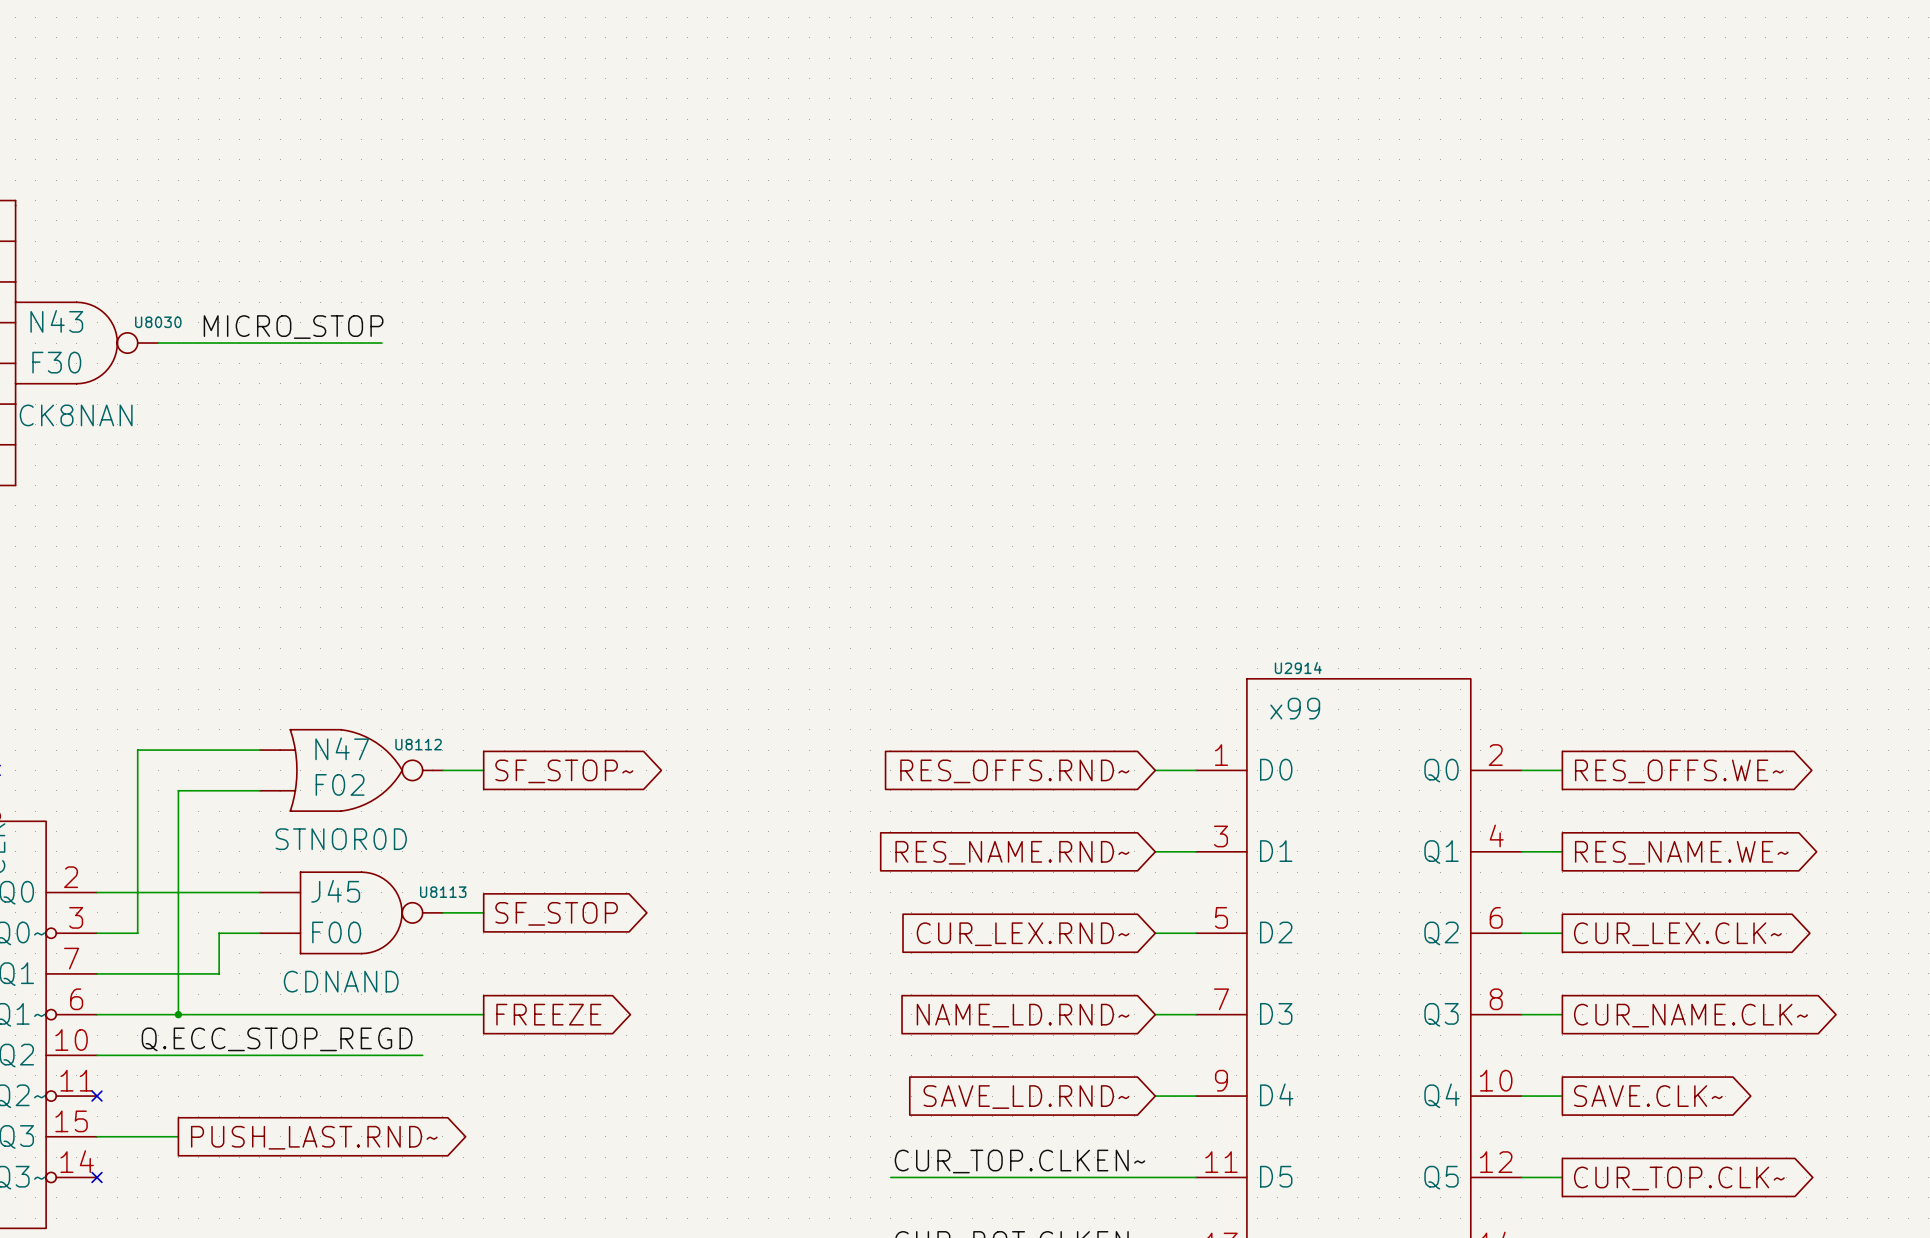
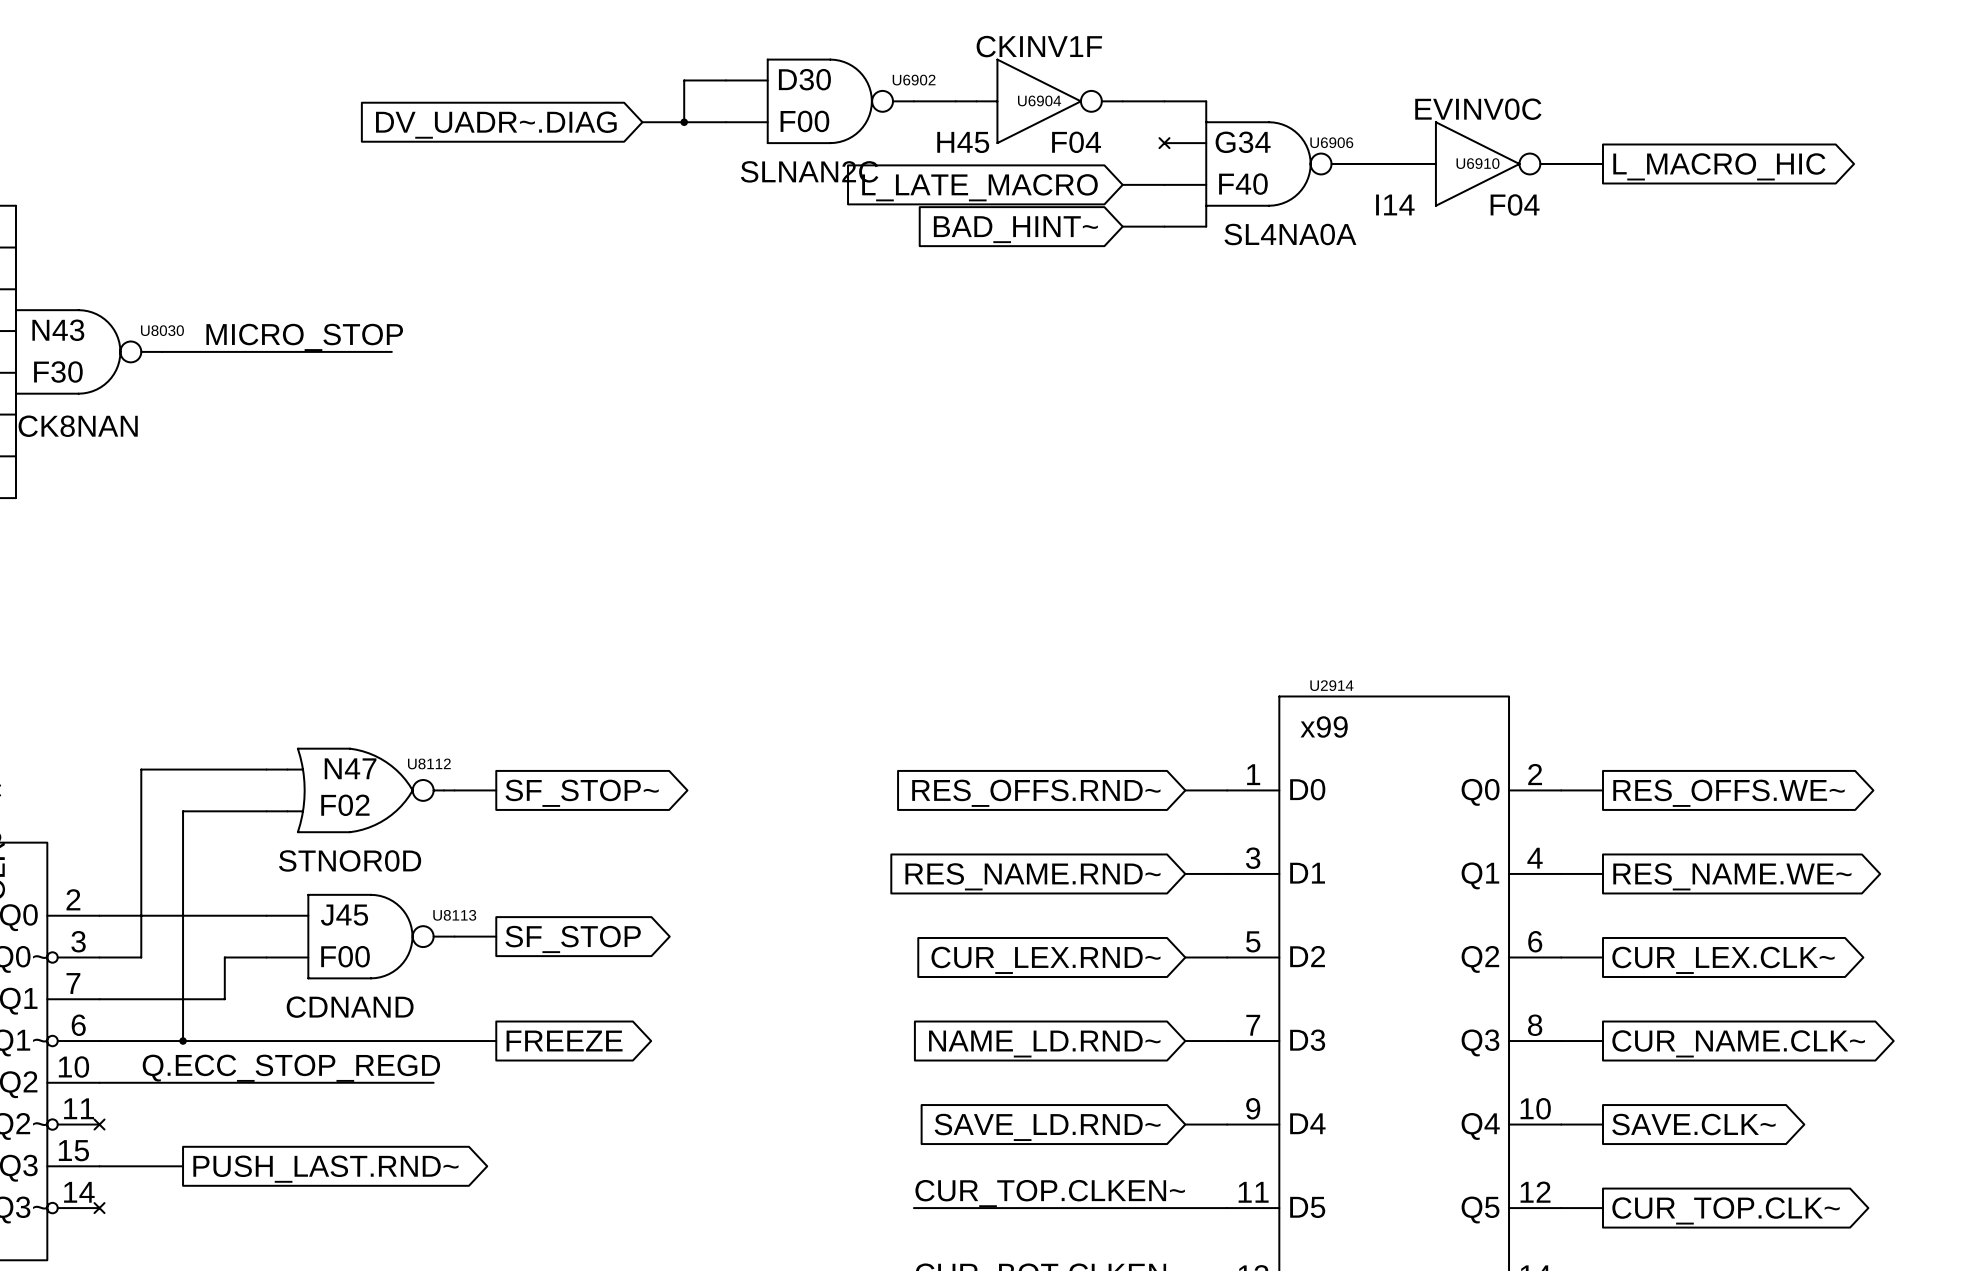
wire: none -> (725, 80) (684, 80) (684, 122)
U6902: none -> F00 (819, 101)
wire: none -> (913, 101) (955, 101)
U6904: none -> F04 (1039, 101)
wire: none -> (1122, 101) (1164, 101)
wire: none -> (642, 122) (725, 122)
junction: none -> (684, 122)
global label: none -> DV_UADR~.DIAG (496, 125)
no-connect mark: none -> (1164, 143)
U6906: none -> F40 (1258, 163)
wire: none -> (1352, 163) (1394, 163)
U6910: none -> F04 (1477, 163)
wire: none -> (1561, 163) (1602, 163)
global label: none -> L_MACRO_HIC (1719, 166)
wire: none -> (1122, 184) (1164, 184)
global label: none -> L_LATE_MACRO (979, 187)
wire: none -> (1122, 226) (1164, 226)
global label: none -> BAD_HINT~ (1015, 229)

